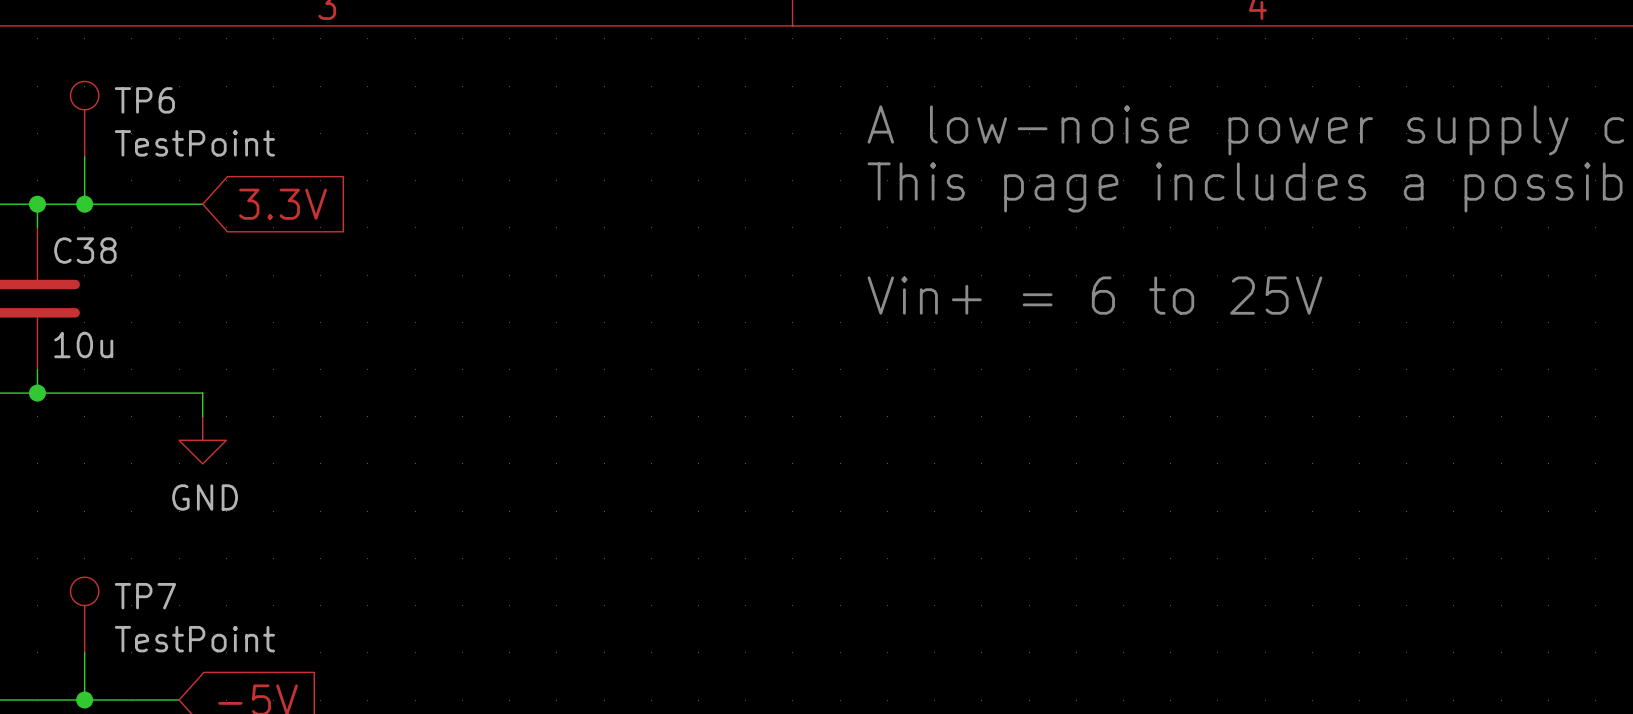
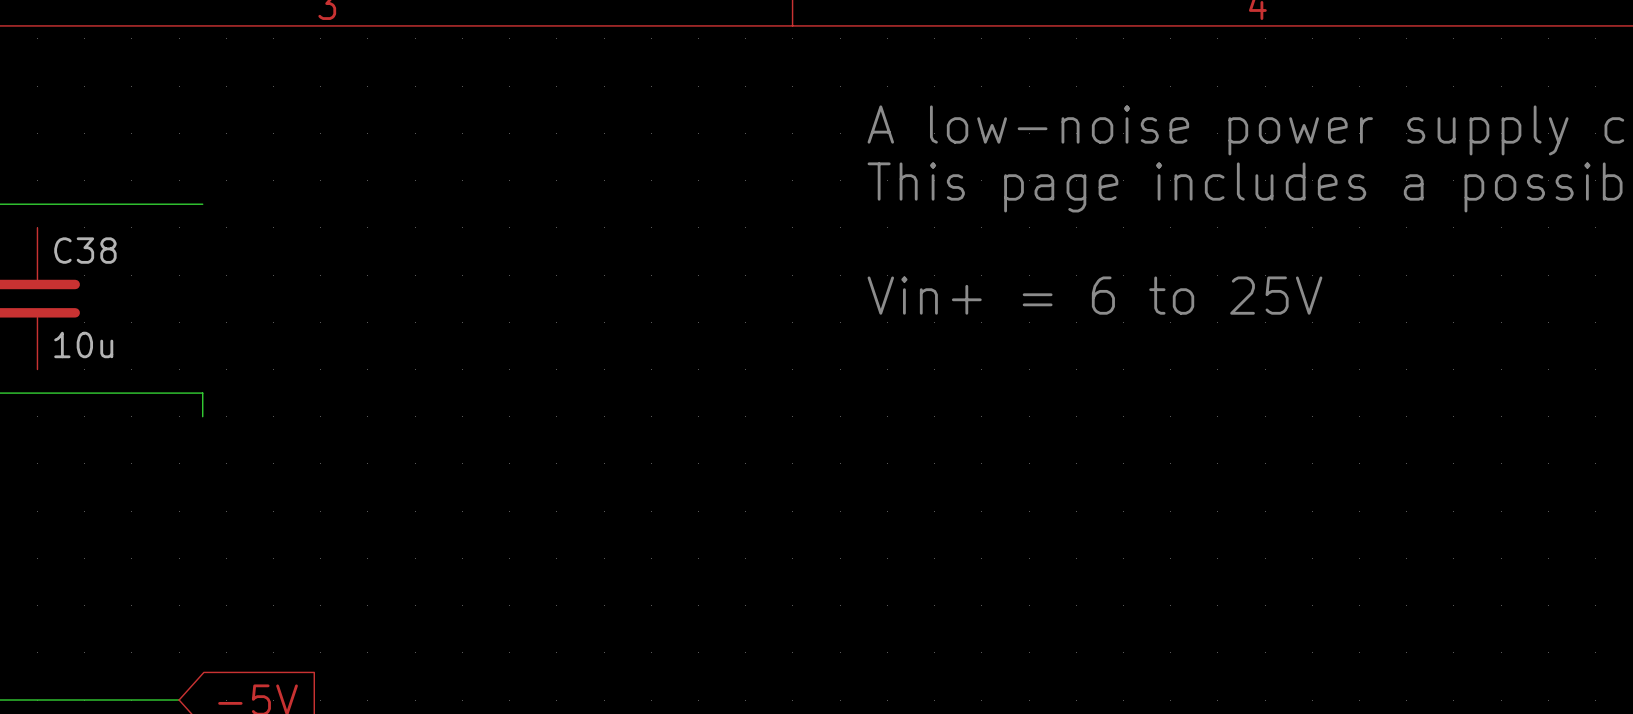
TP6: TestPoint (84, 119) -> none
wire: (84, 157) (84, 204) -> none
wire: (37, 204) (37, 227) -> none
junction: (37, 204) -> none
junction: (84, 204) -> none
global label: 3.3V (282, 204) -> none
wire: (37, 369) (37, 393) -> none
junction: (37, 393) -> none
power symbol: GND (202, 440) -> none
TP7: TestPoint (84, 615) -> none
wire: (84, 652) (84, 700) -> none
junction: (84, 700) -> none

